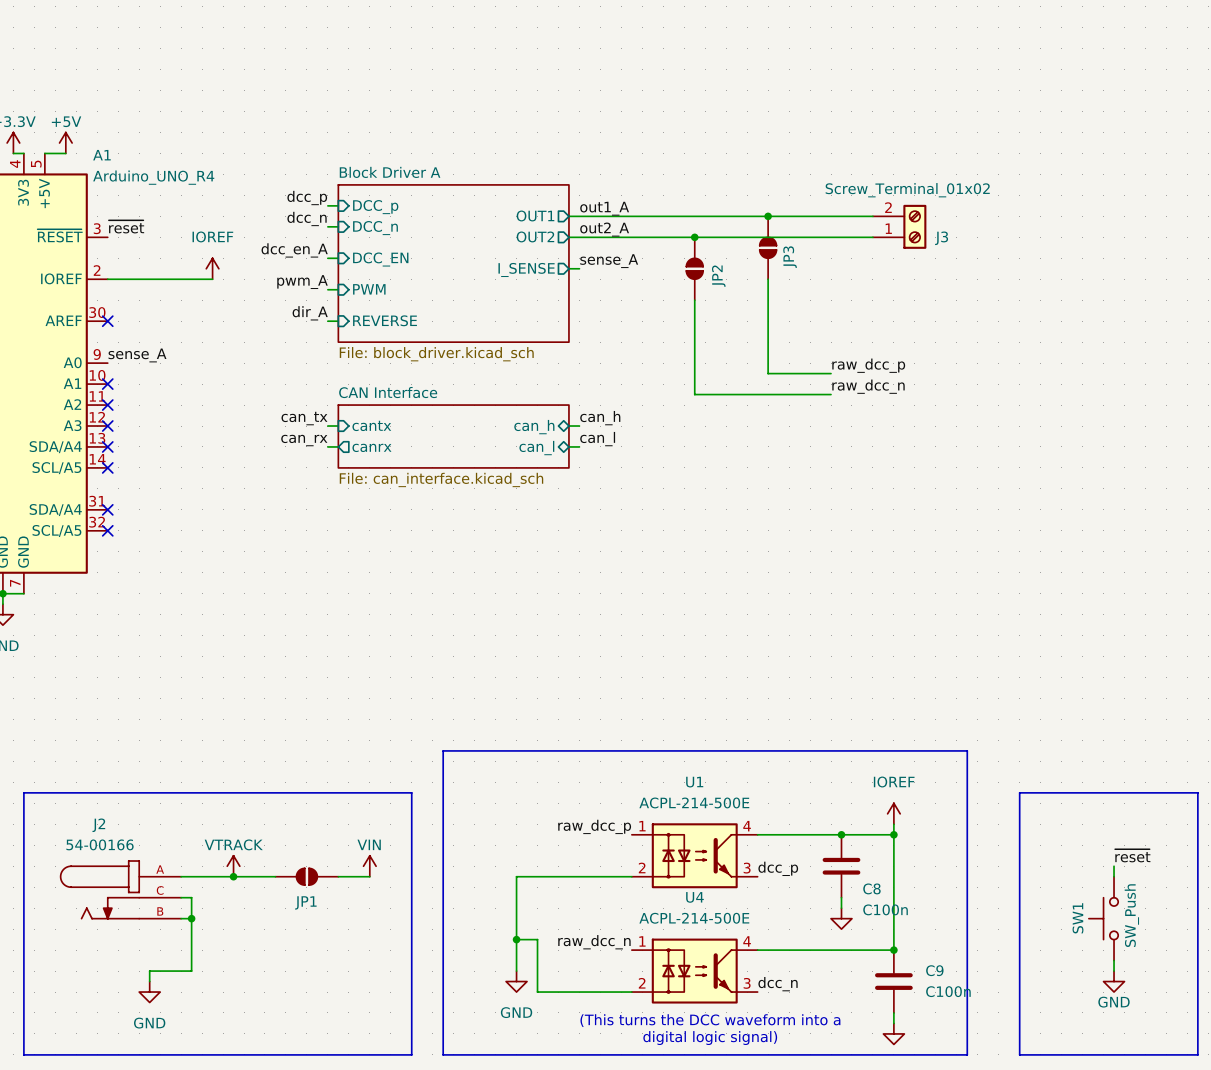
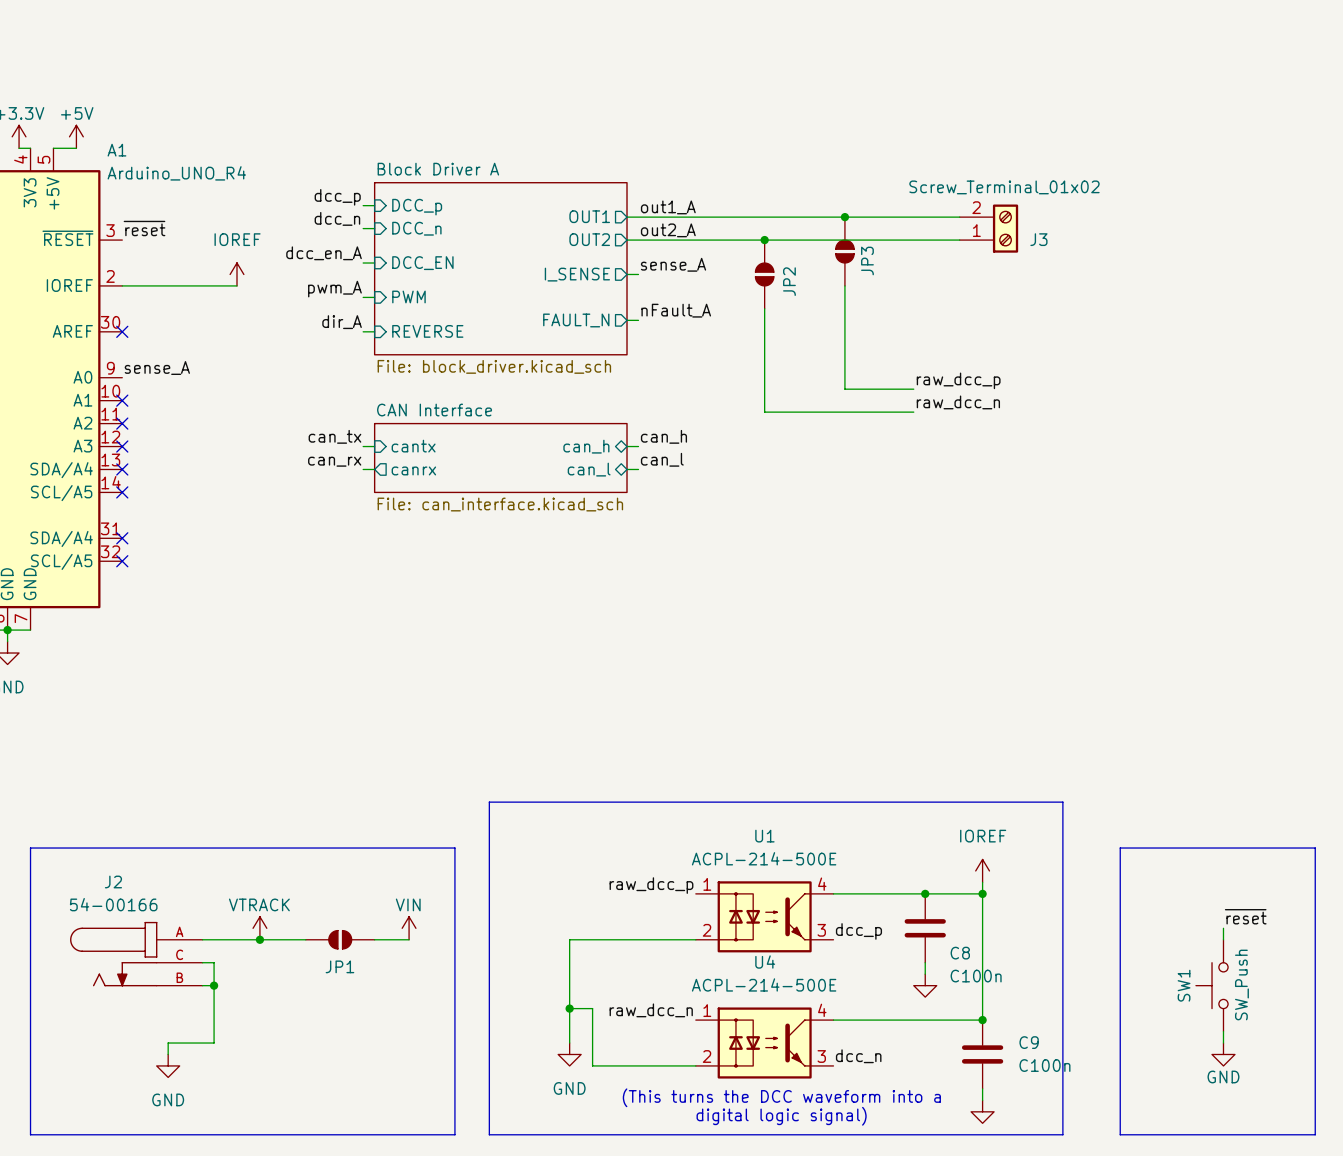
label: none -> nFault_A (676, 310)
wire: none -> (627, 320) (638, 320)
sheet pin: none -> FAULT_N (576, 320)

